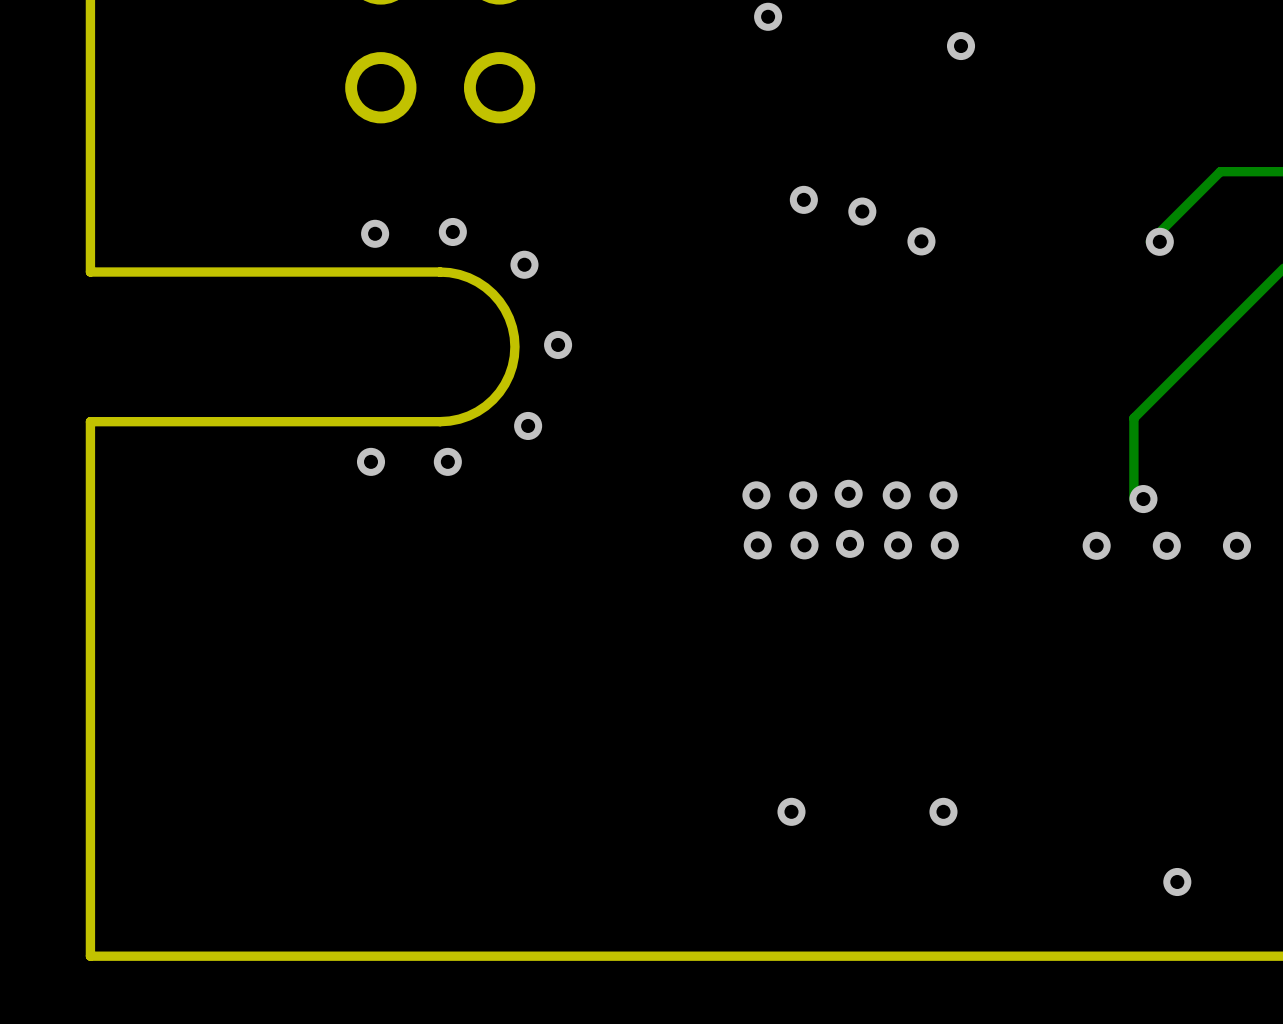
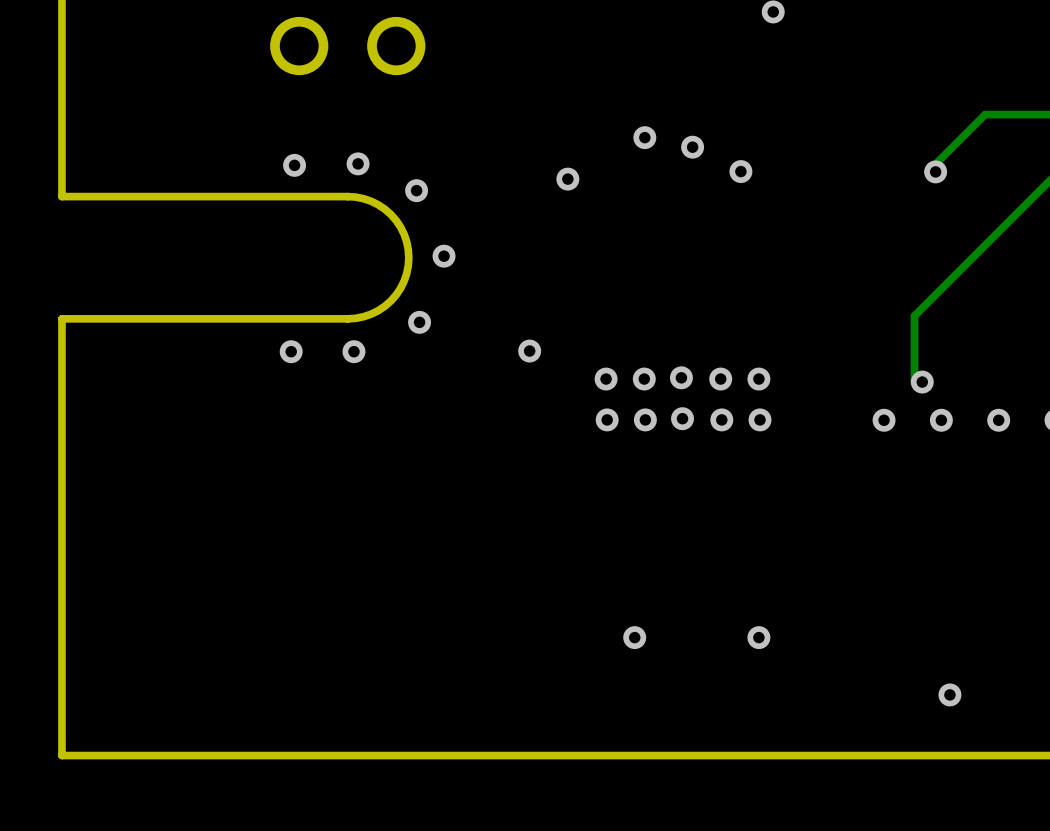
via: none -> (567, 179)
via: none -> (529, 351)

